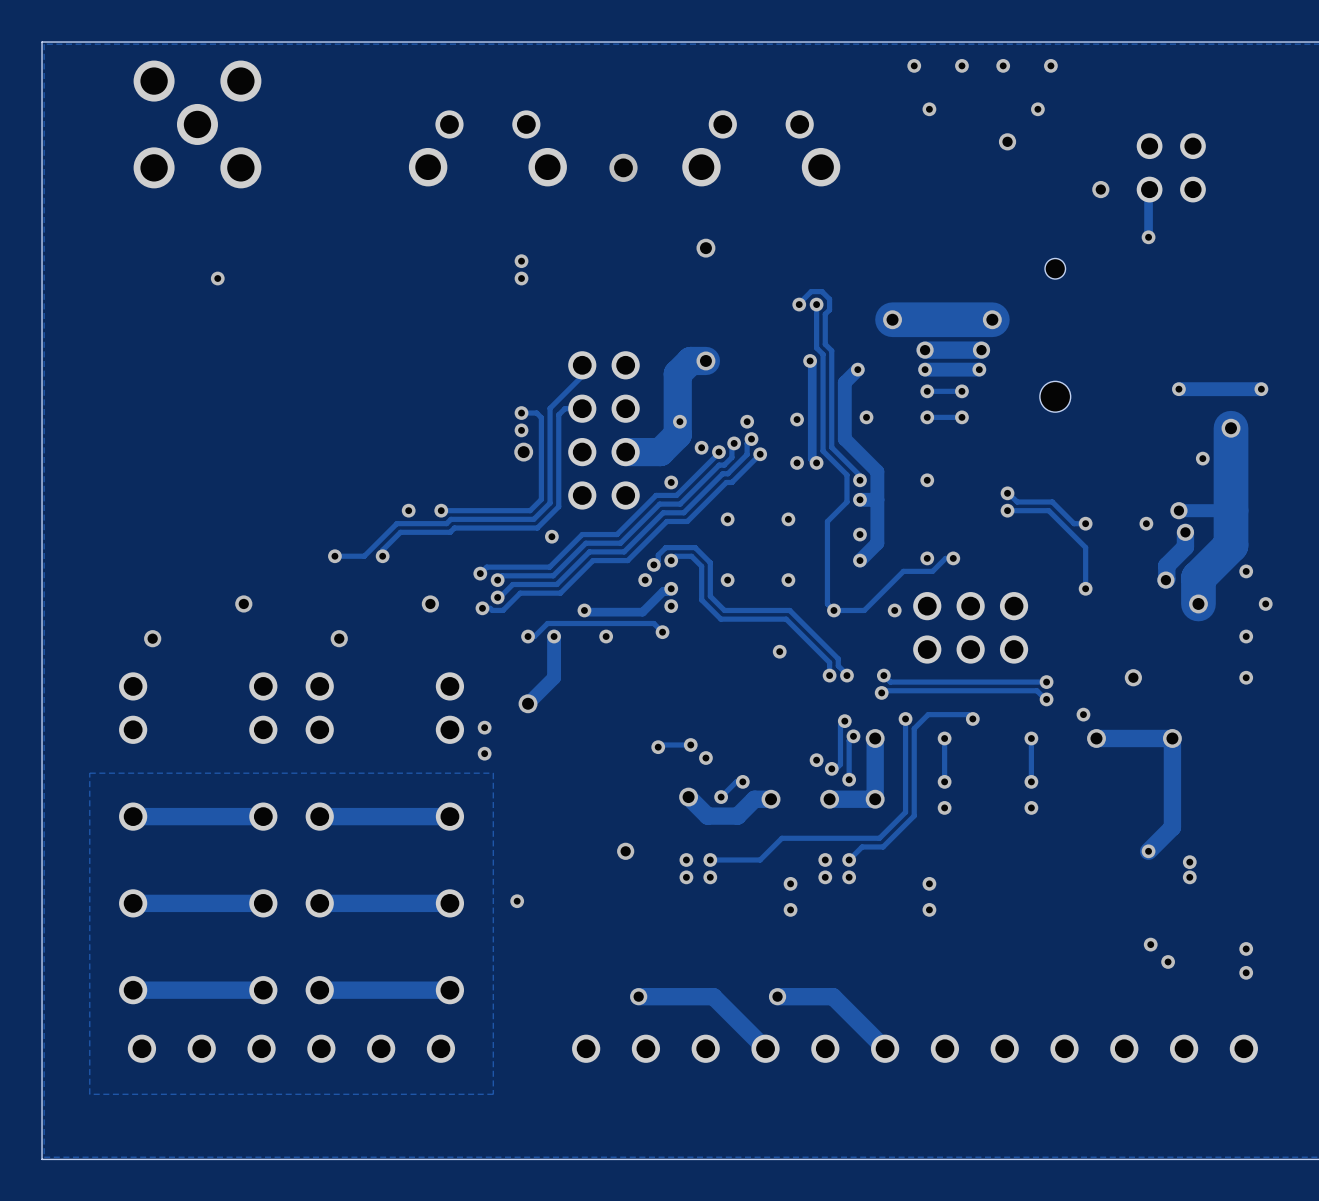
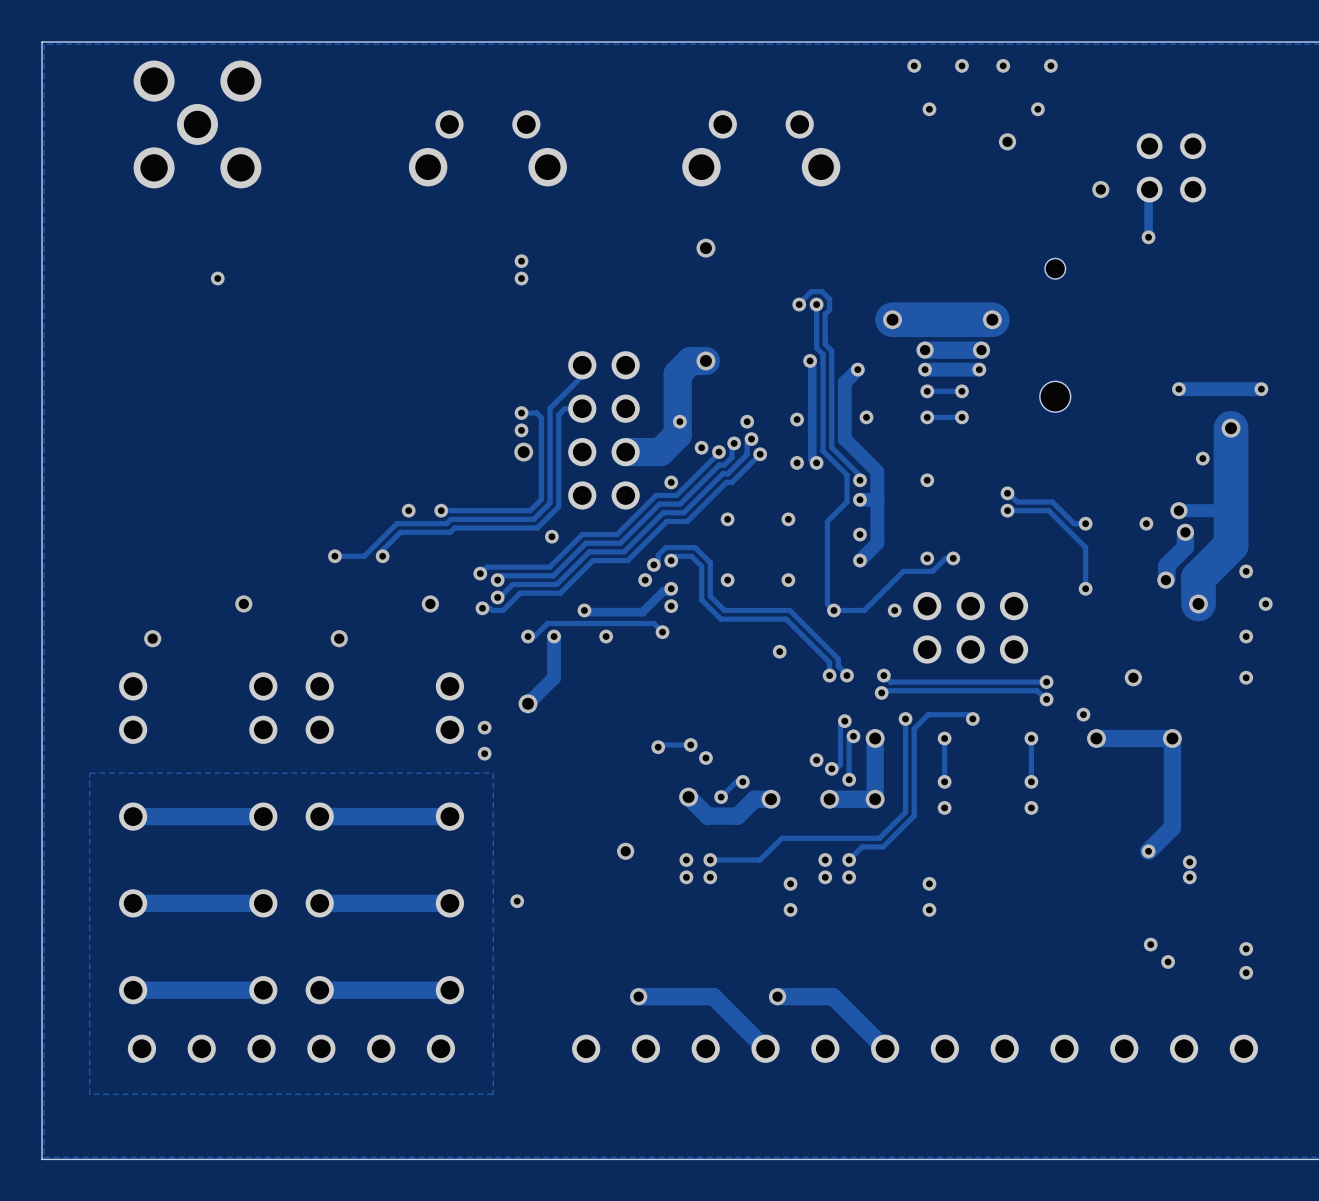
via: (623, 167) -> none

